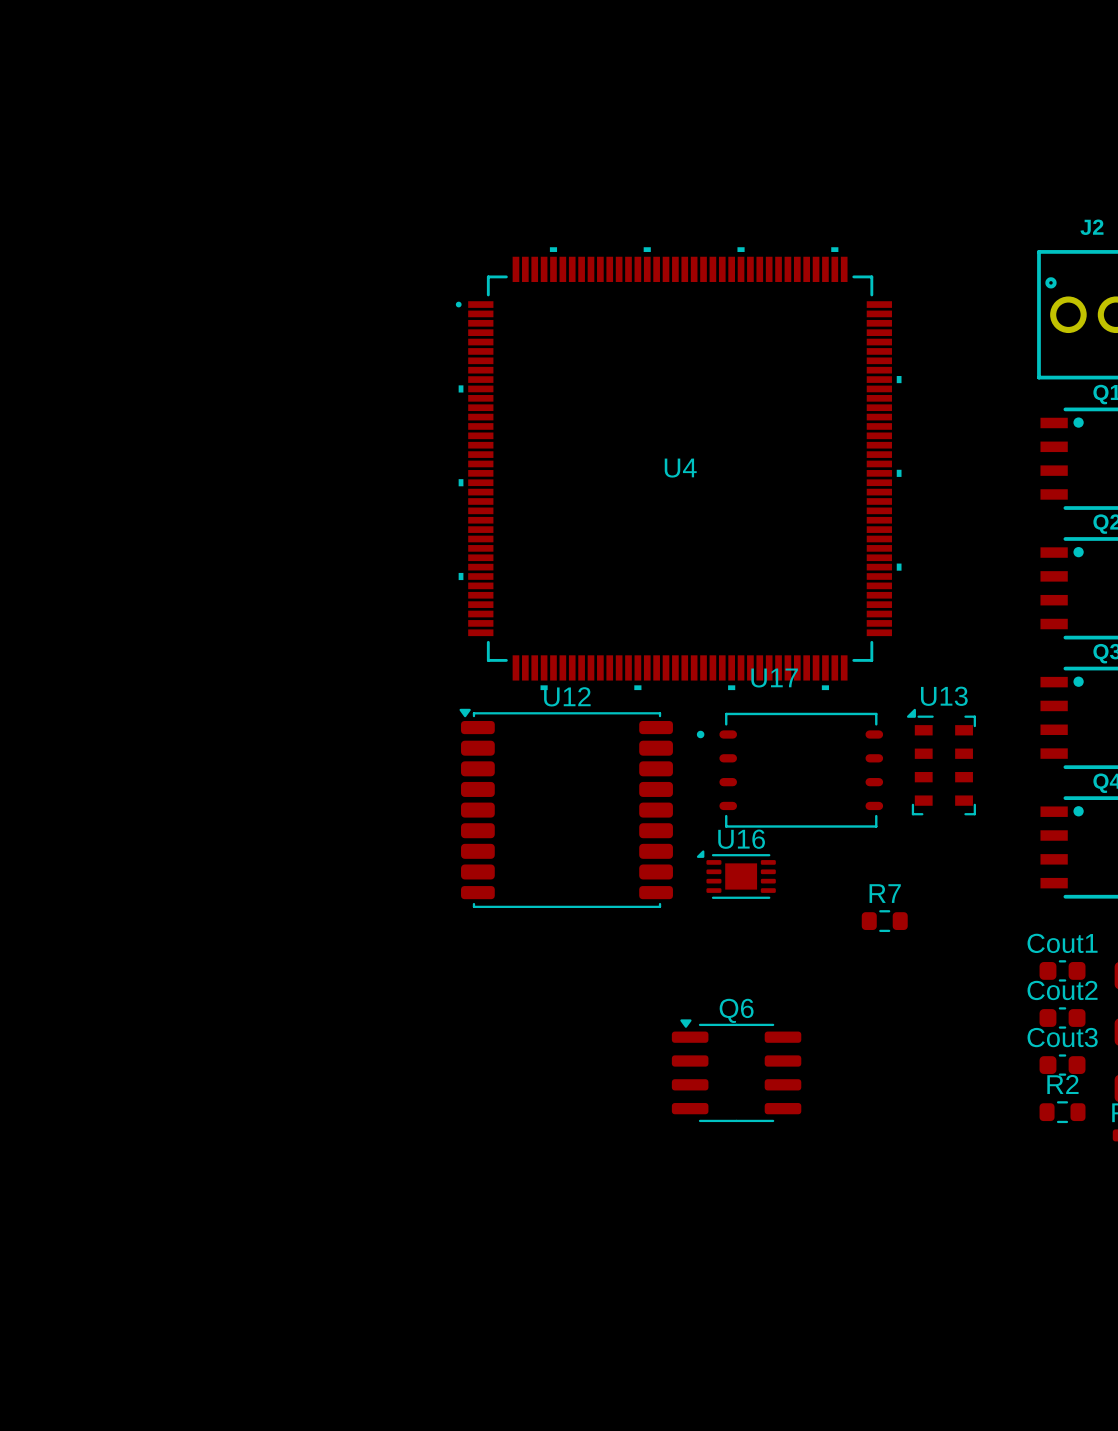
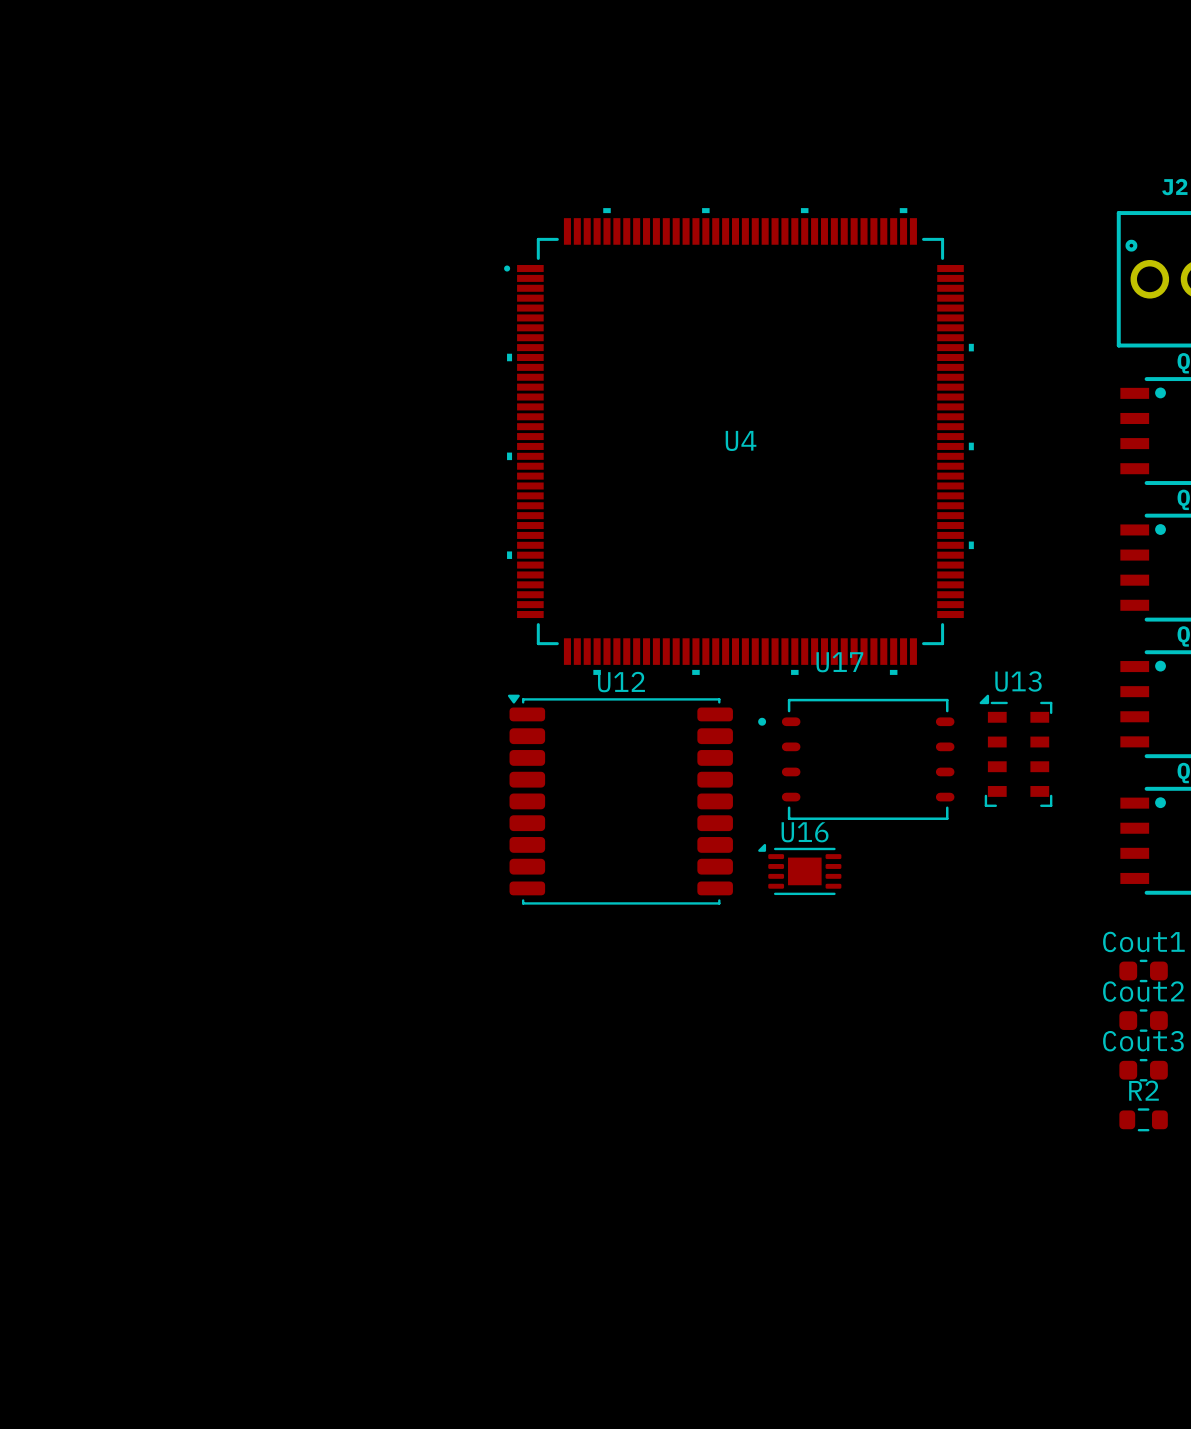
R7: (884, 921) -> none
Q6: (736, 1070) -> none

